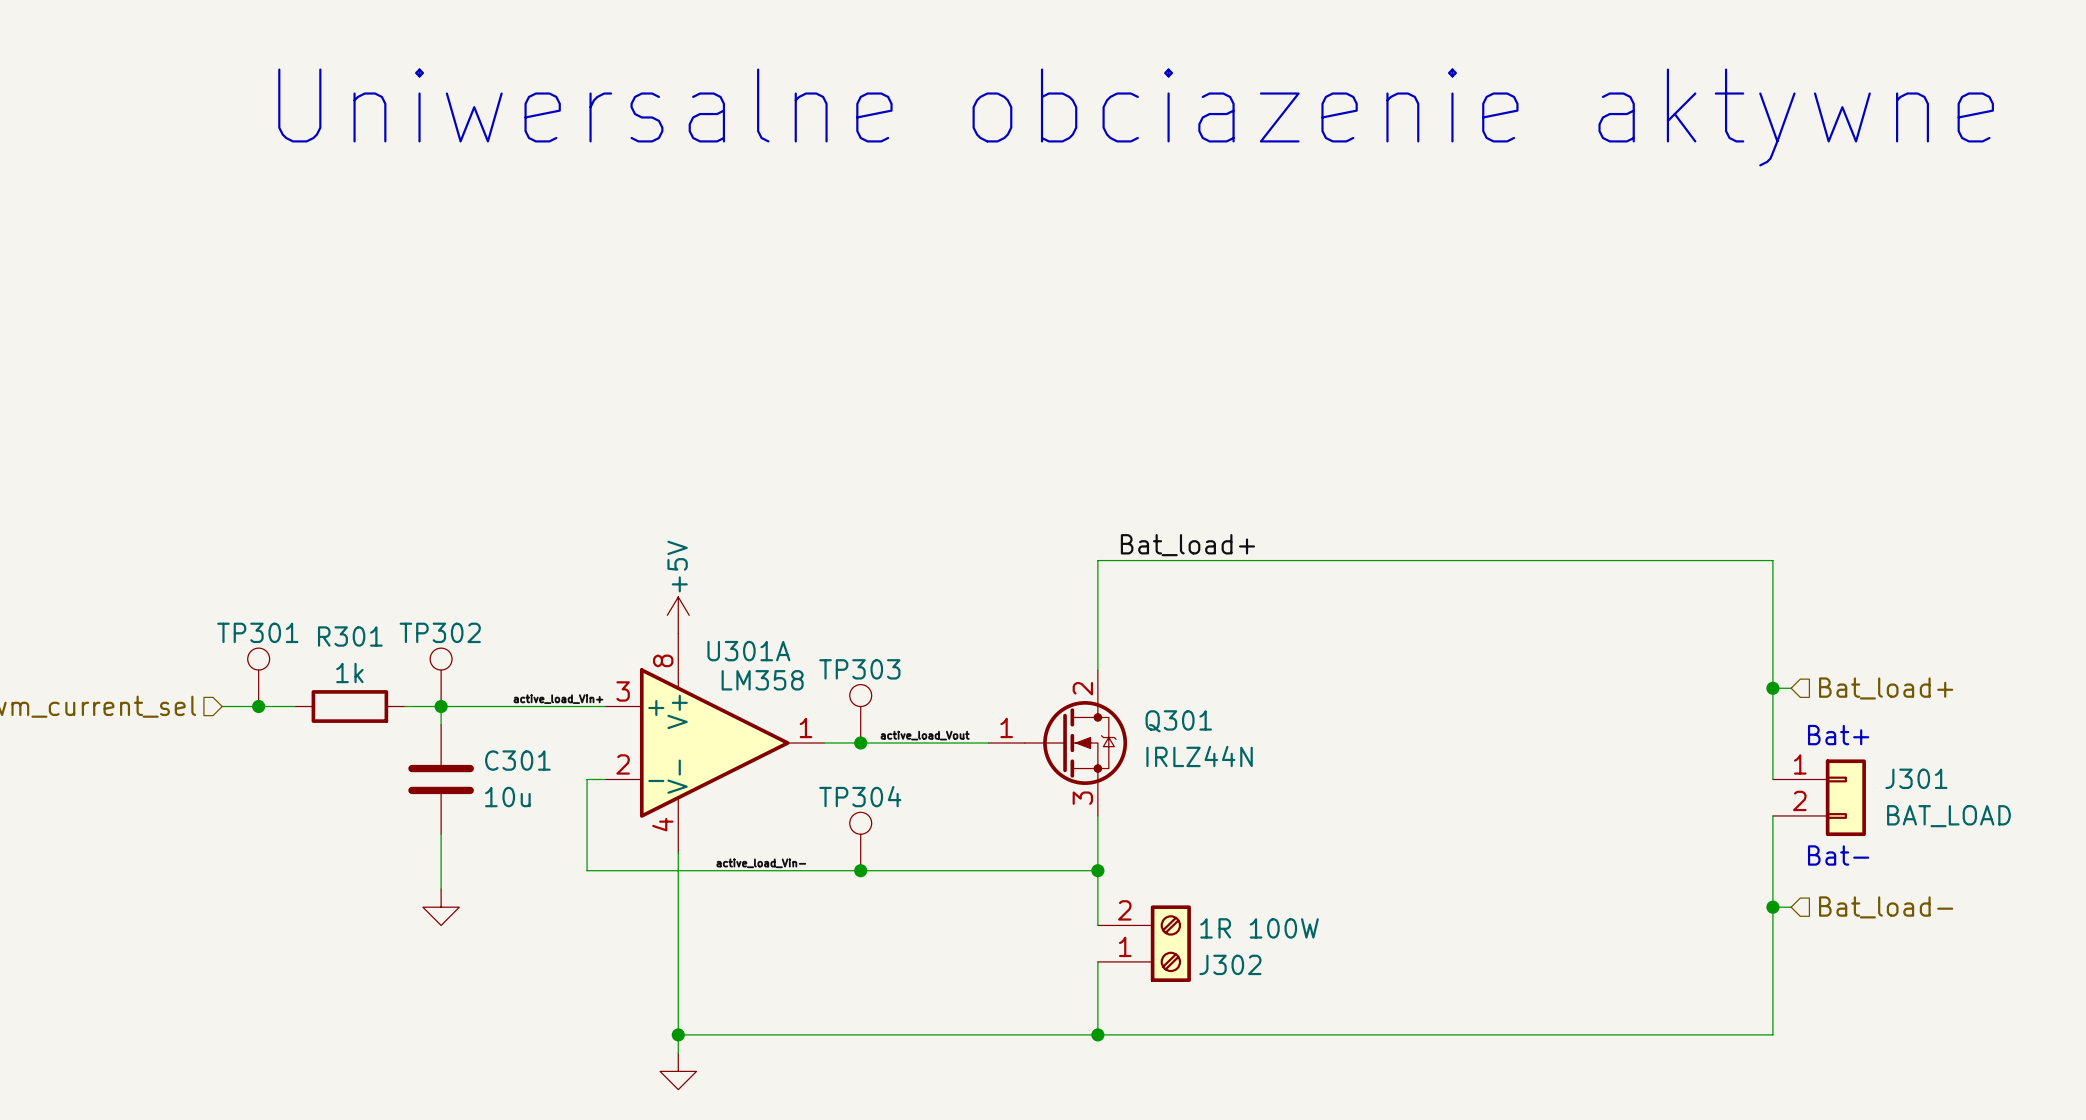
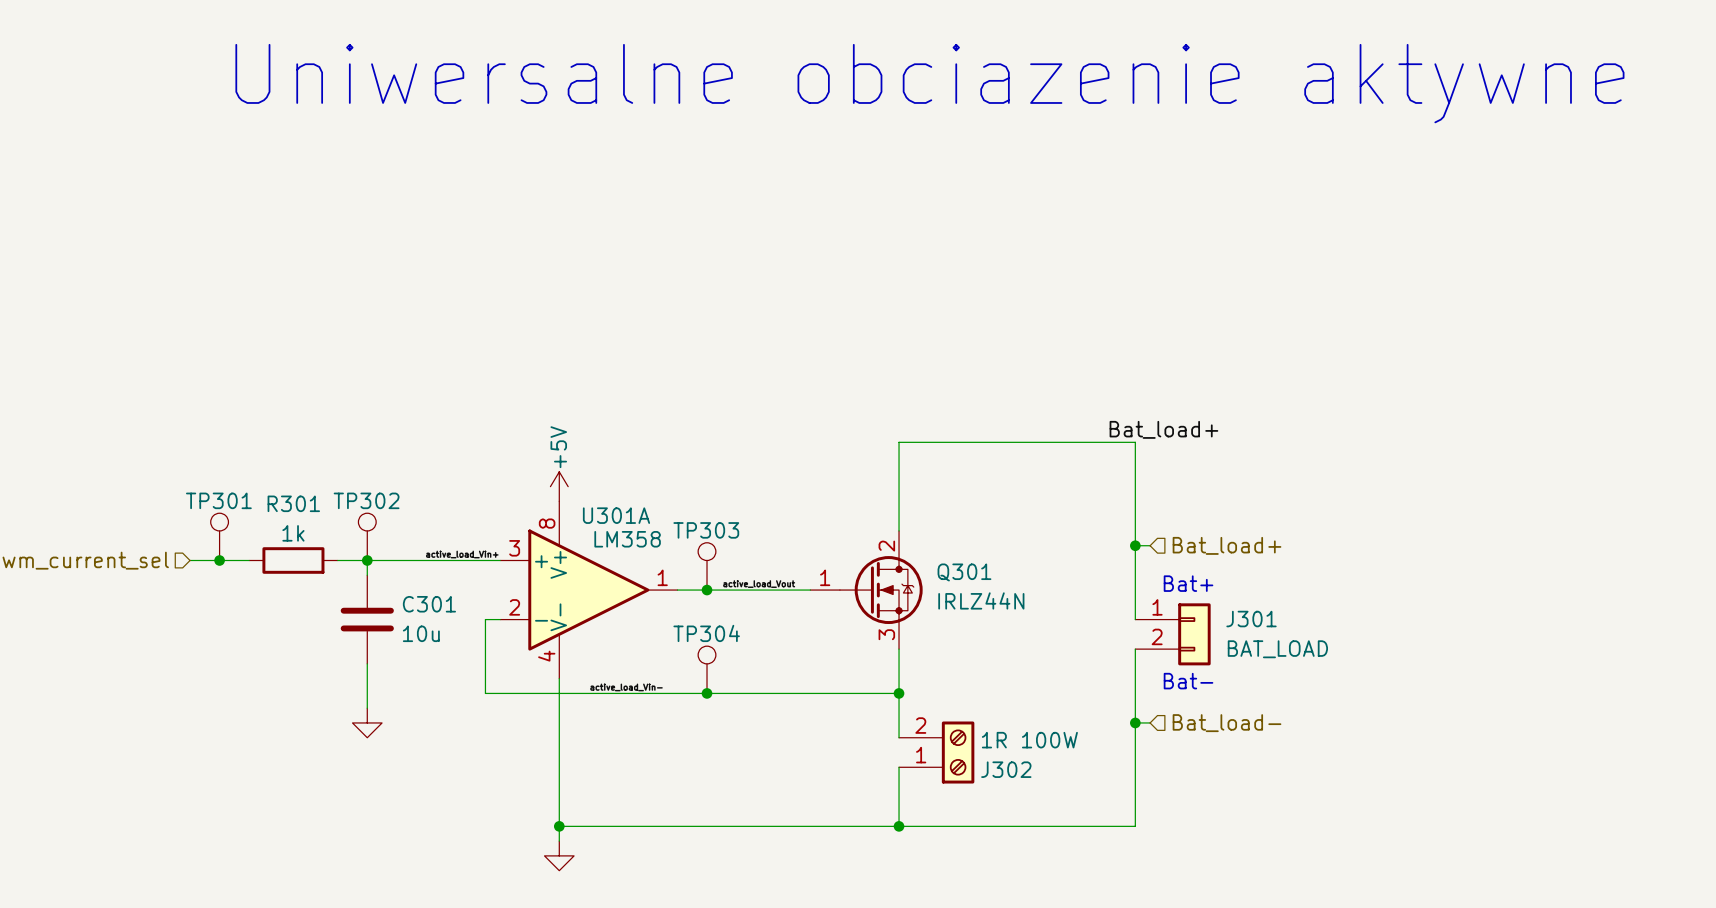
label position: Bat_load+ (1187, 545) -> Bat_load+ (1163, 429)
wire: (1389, 560) (1772, 560) (1772, 779) -> (1135, 442) (1135, 619)
wire: none -> (1135, 545) (1150, 545)
junction: none -> (1135, 545)
hierarchical label: none -> Bat_load+ (1227, 545)
wire: (1772, 688) (1791, 688) -> none
junction: (1772, 688) -> none
hierarchical label: Bat_load+ (1886, 688) -> none
text: none -> Bat+ (1188, 583)
text: Bat+ (1838, 735) -> none
J301 position: (1819, 797) -> (1173, 634)
wire: (1772, 815) (1772, 1034) (1389, 1034) -> (1135, 649) (1135, 826)
text: none -> Bat- (1188, 681)
text: Bat- (1838, 855) -> none
wire: none -> (1135, 722) (1150, 722)
junction: none -> (1135, 722)
hierarchical label: none -> Bat_load- (1227, 723)
wire: (1772, 907) (1791, 907) -> none
junction: (1772, 907) -> none
hierarchical label: Bat_load- (1886, 907) -> none

